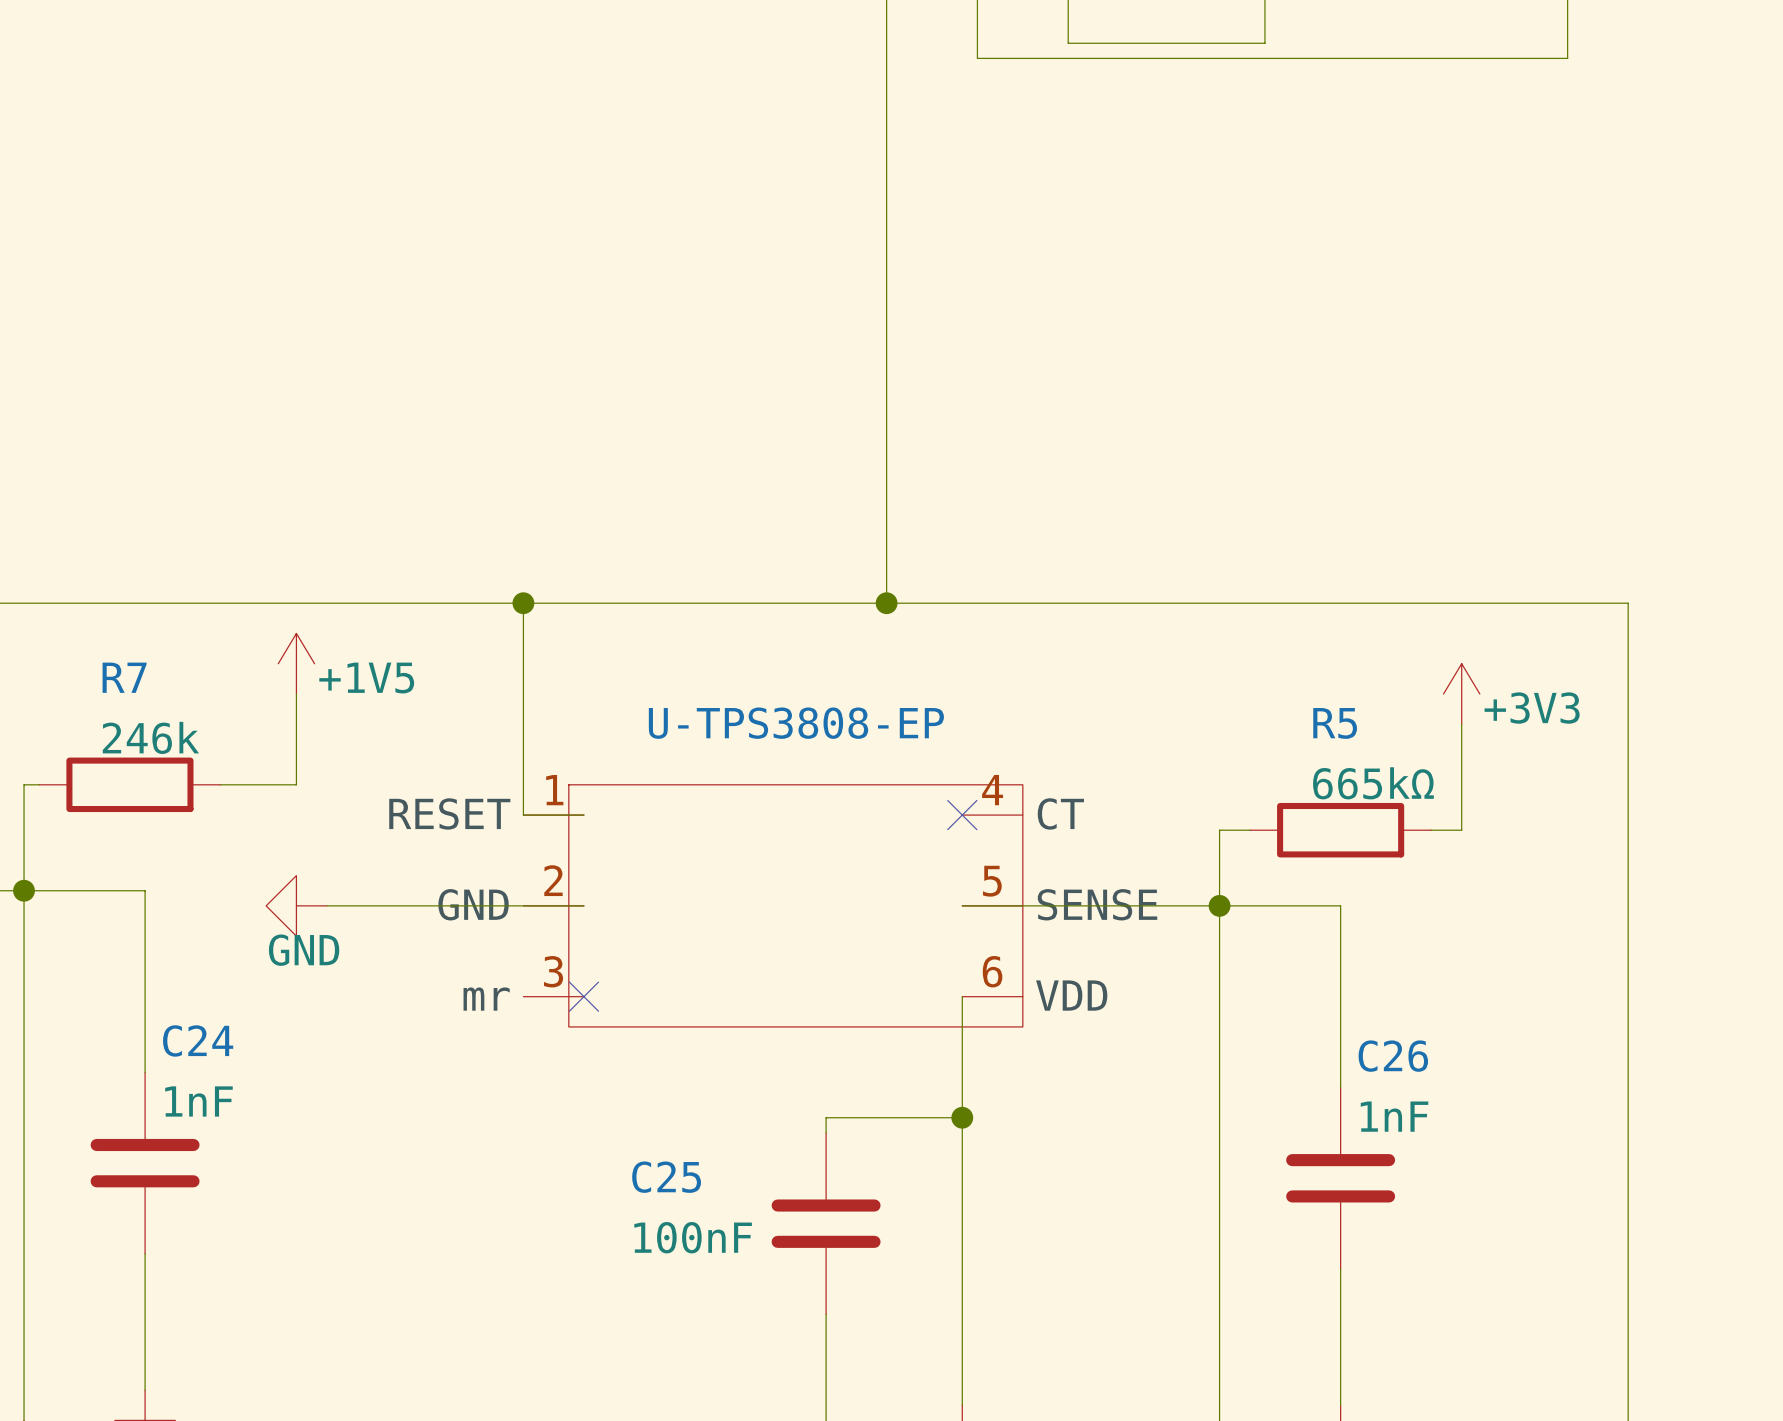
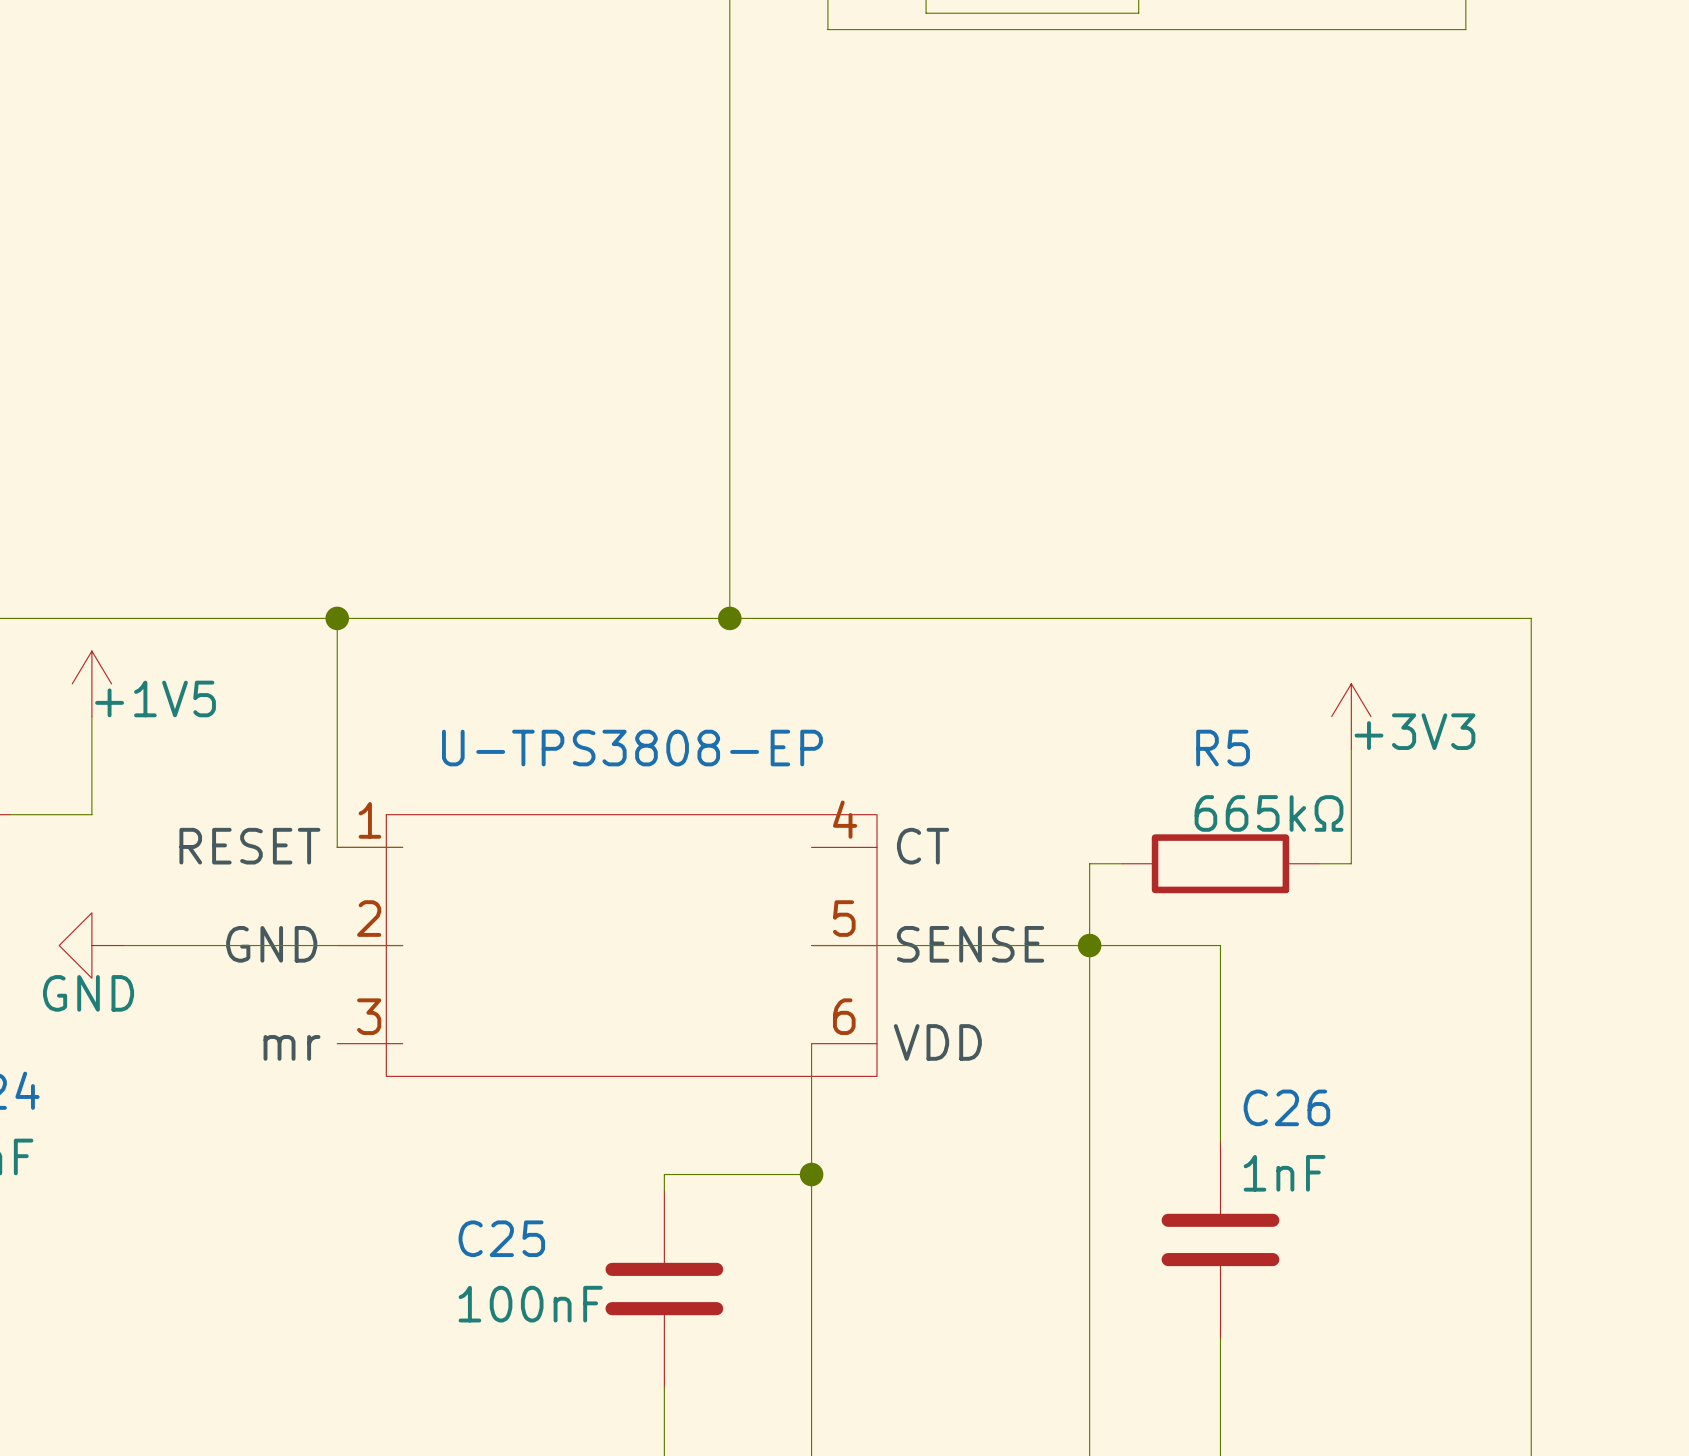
no-connect mark: (962, 815) -> none
no-connect mark: (583, 996) -> none

